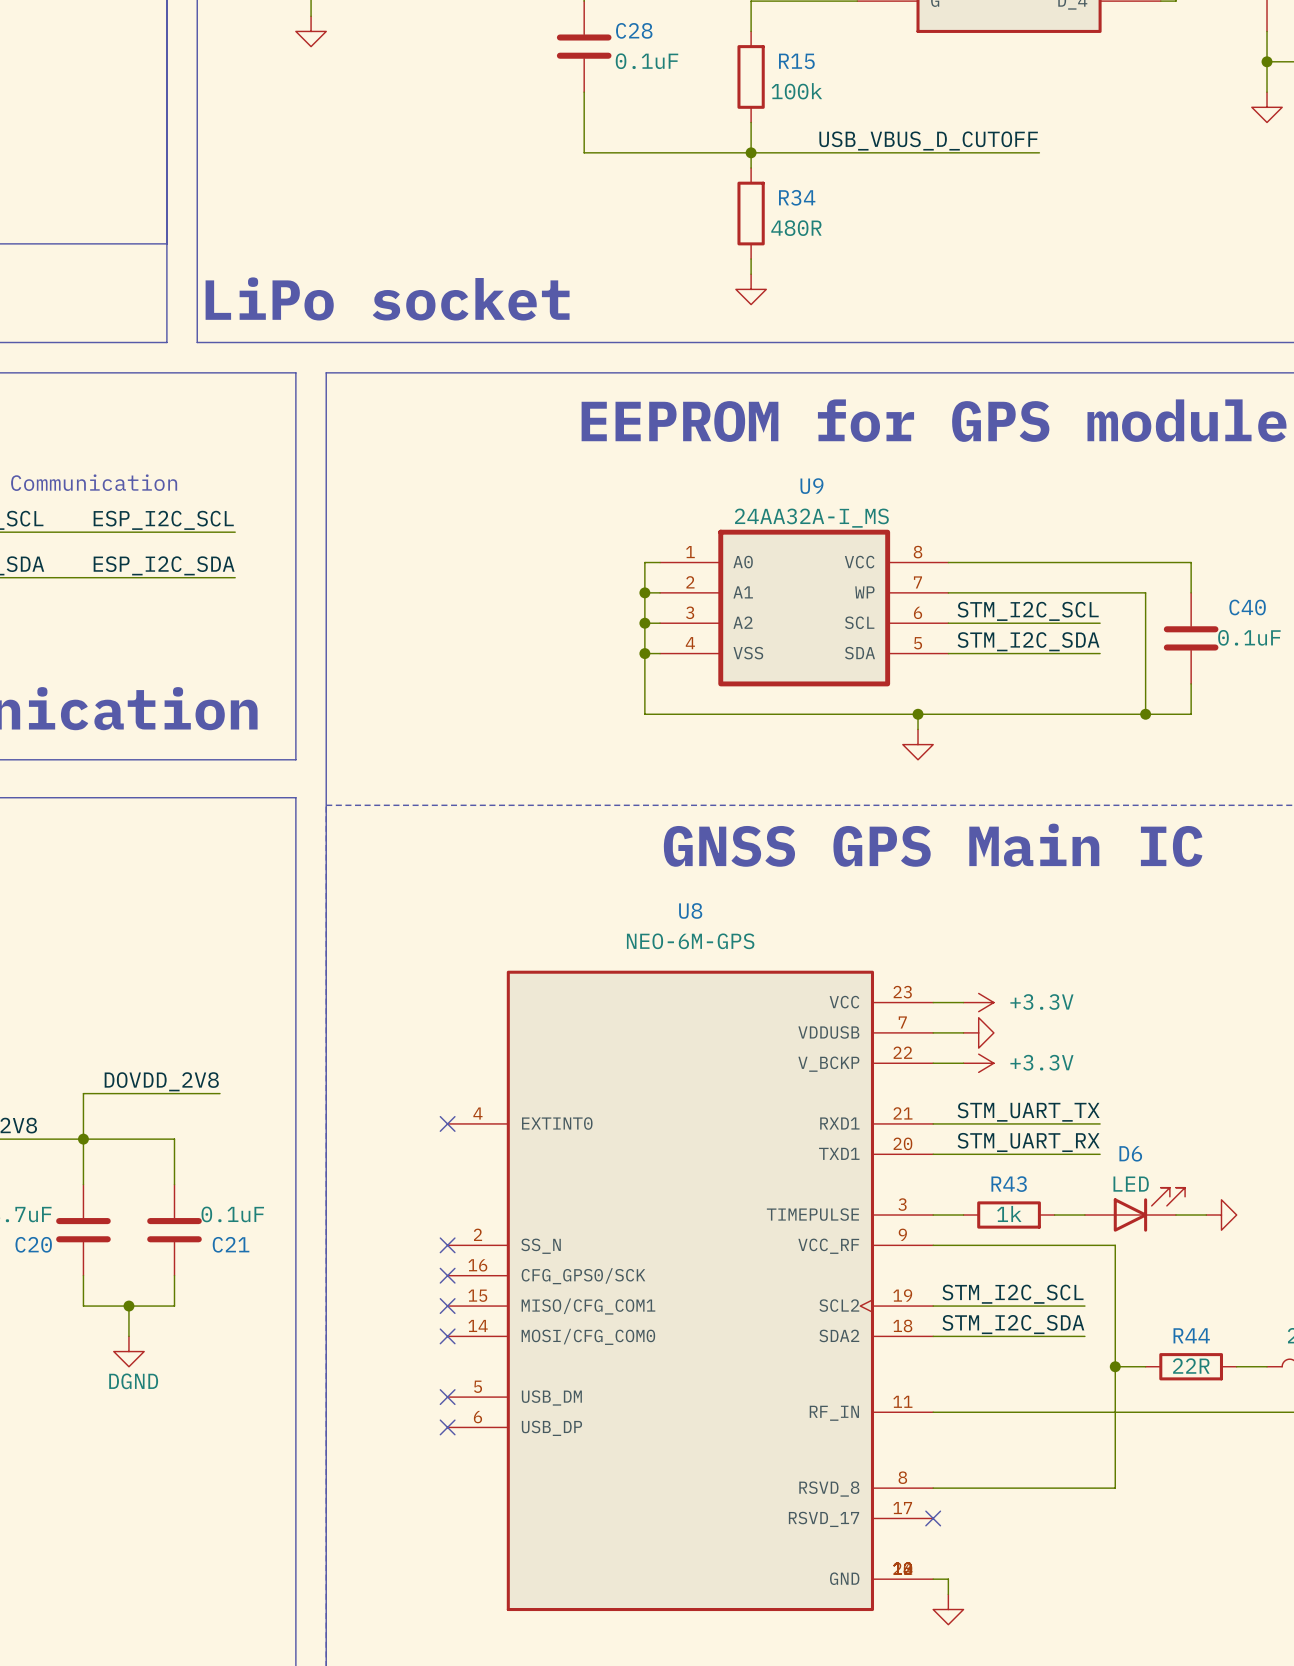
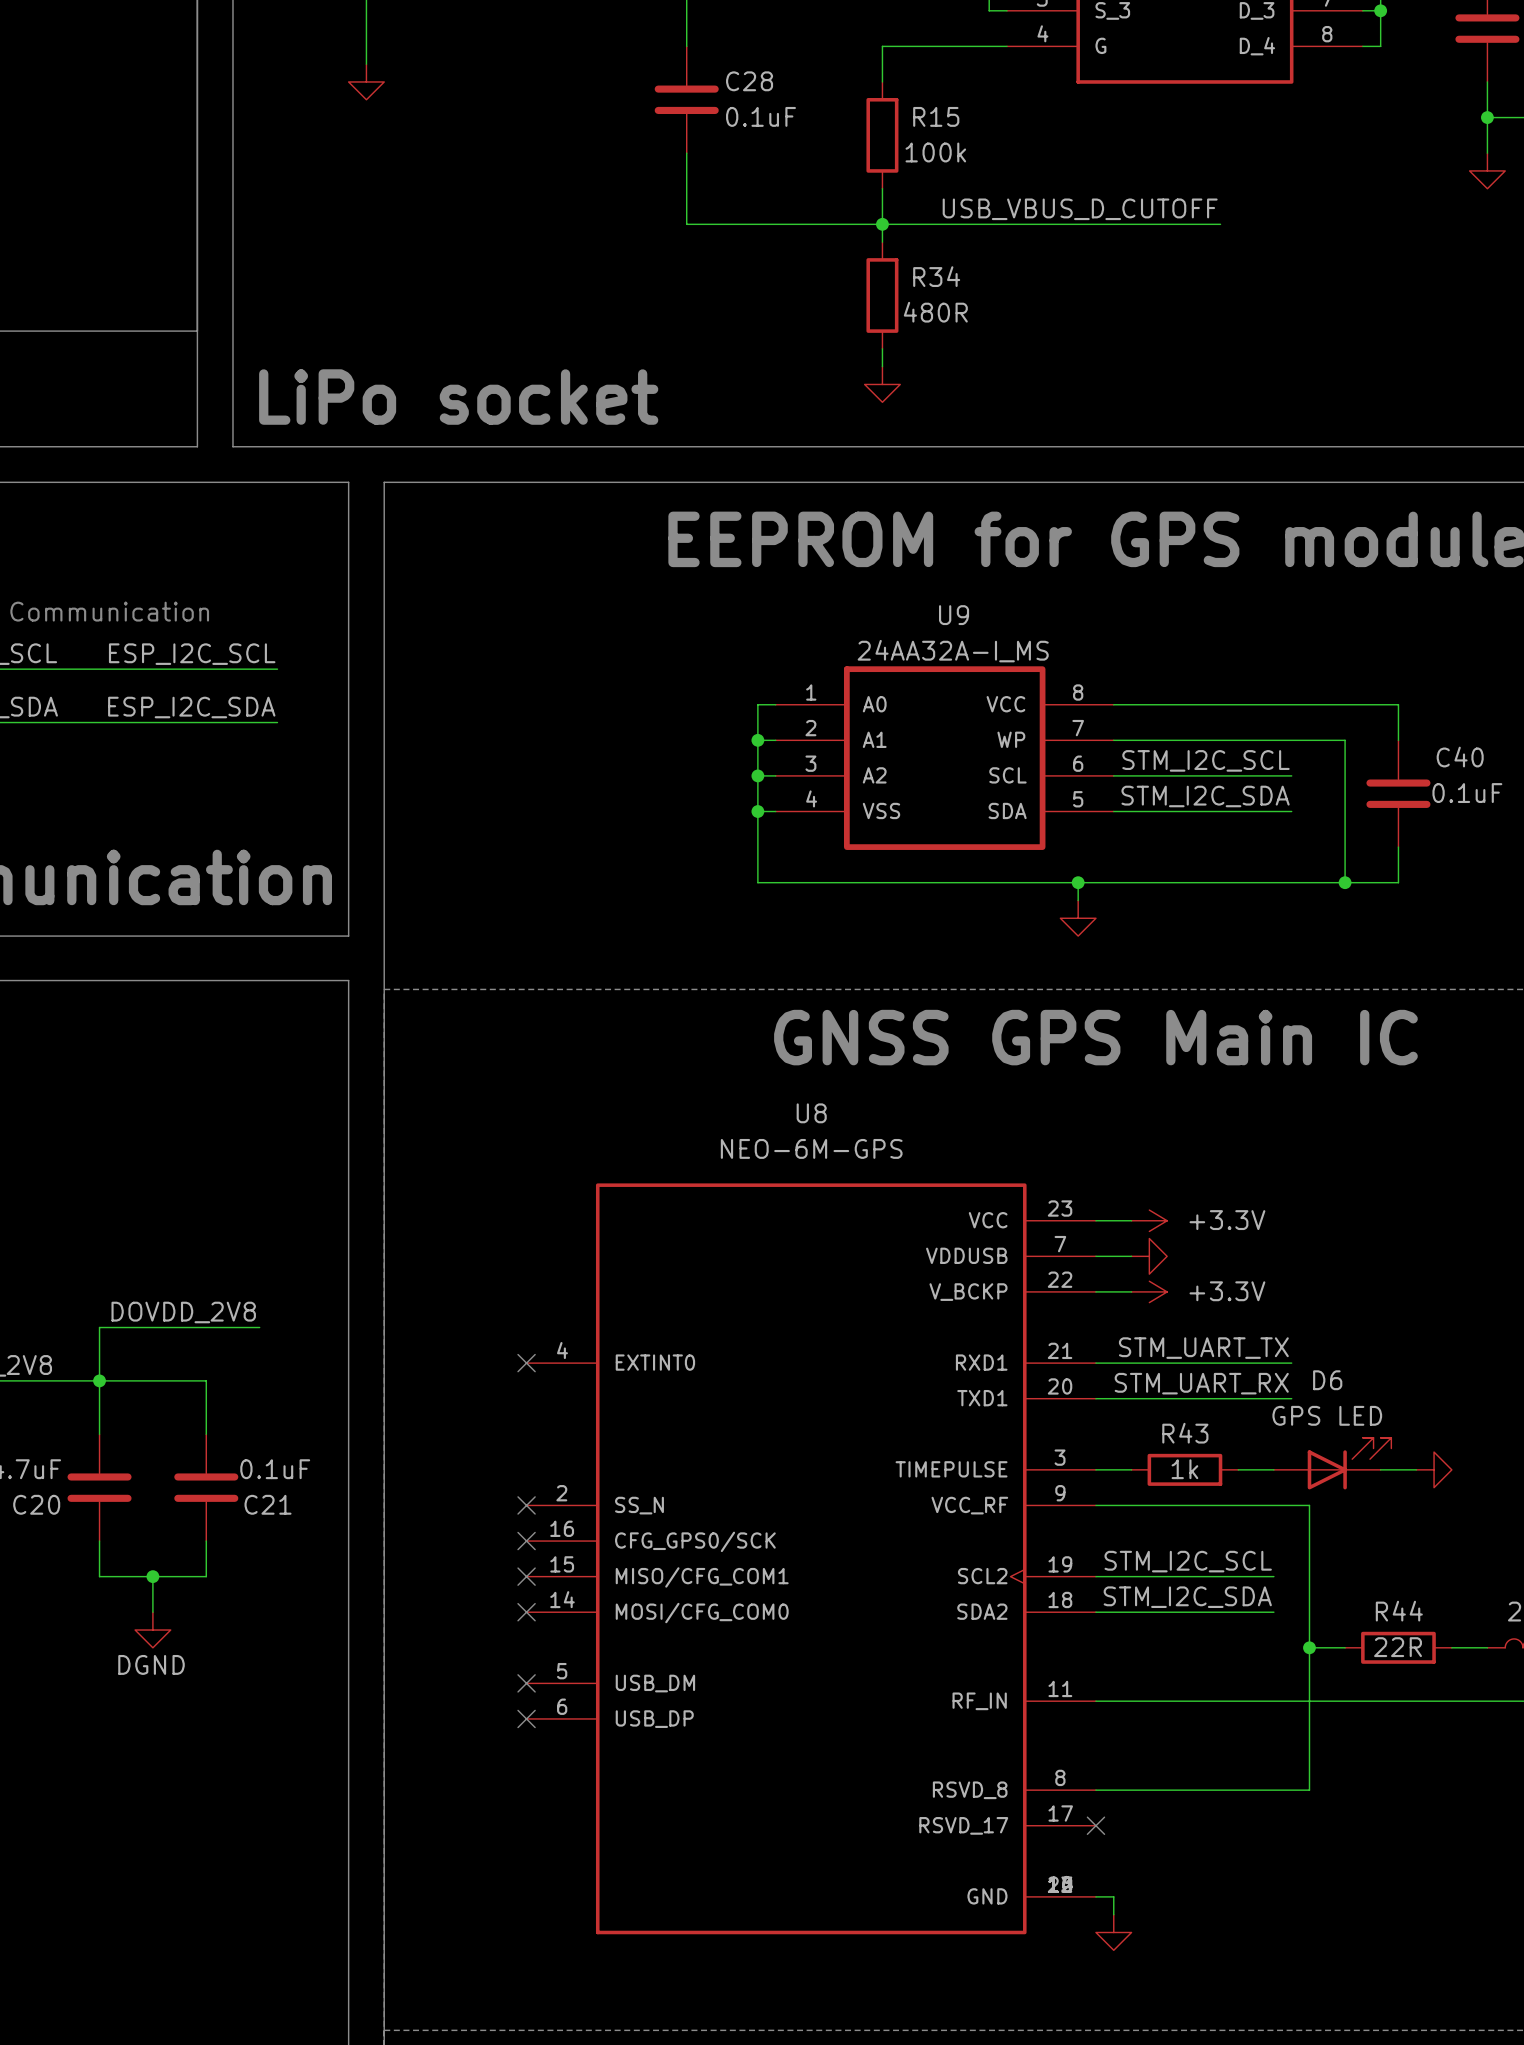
D6 name position: D6 (1130, 1153) -> D6 (1327, 1380)
D6 value: LED (1131, 1184) -> GPS LED (1327, 1415)

